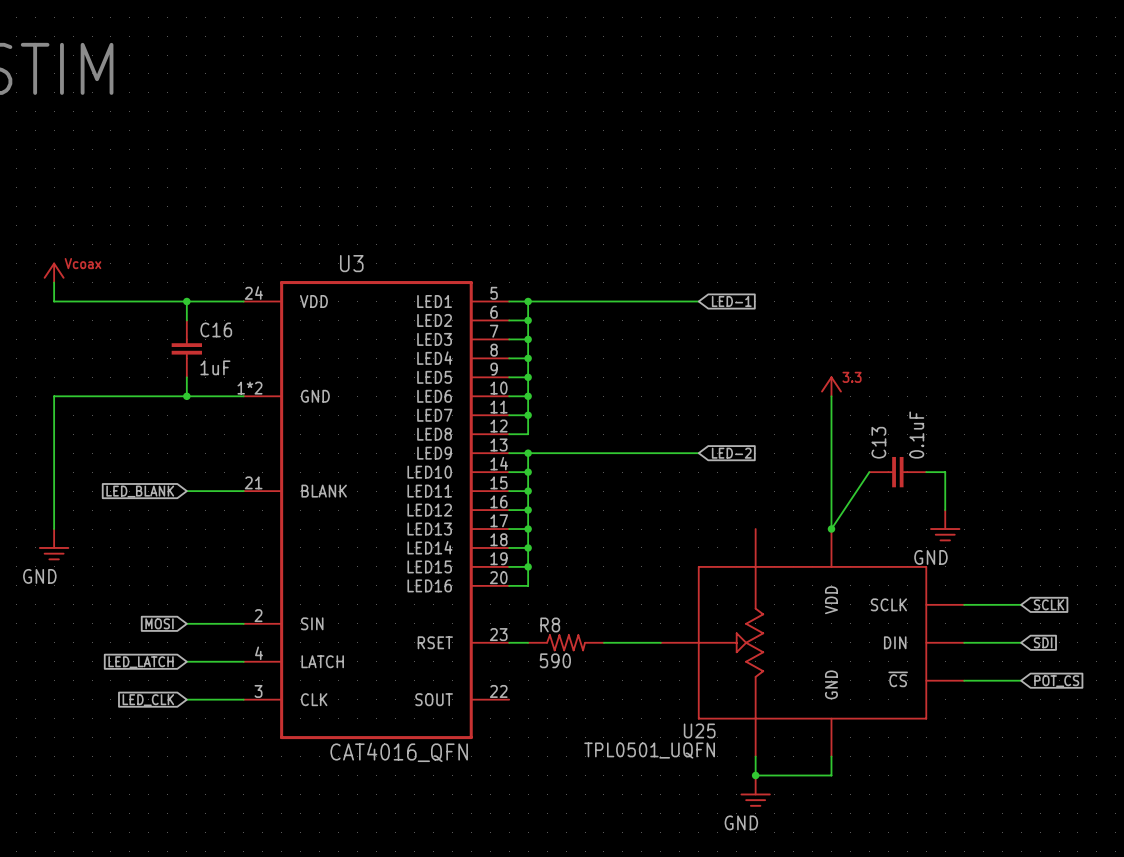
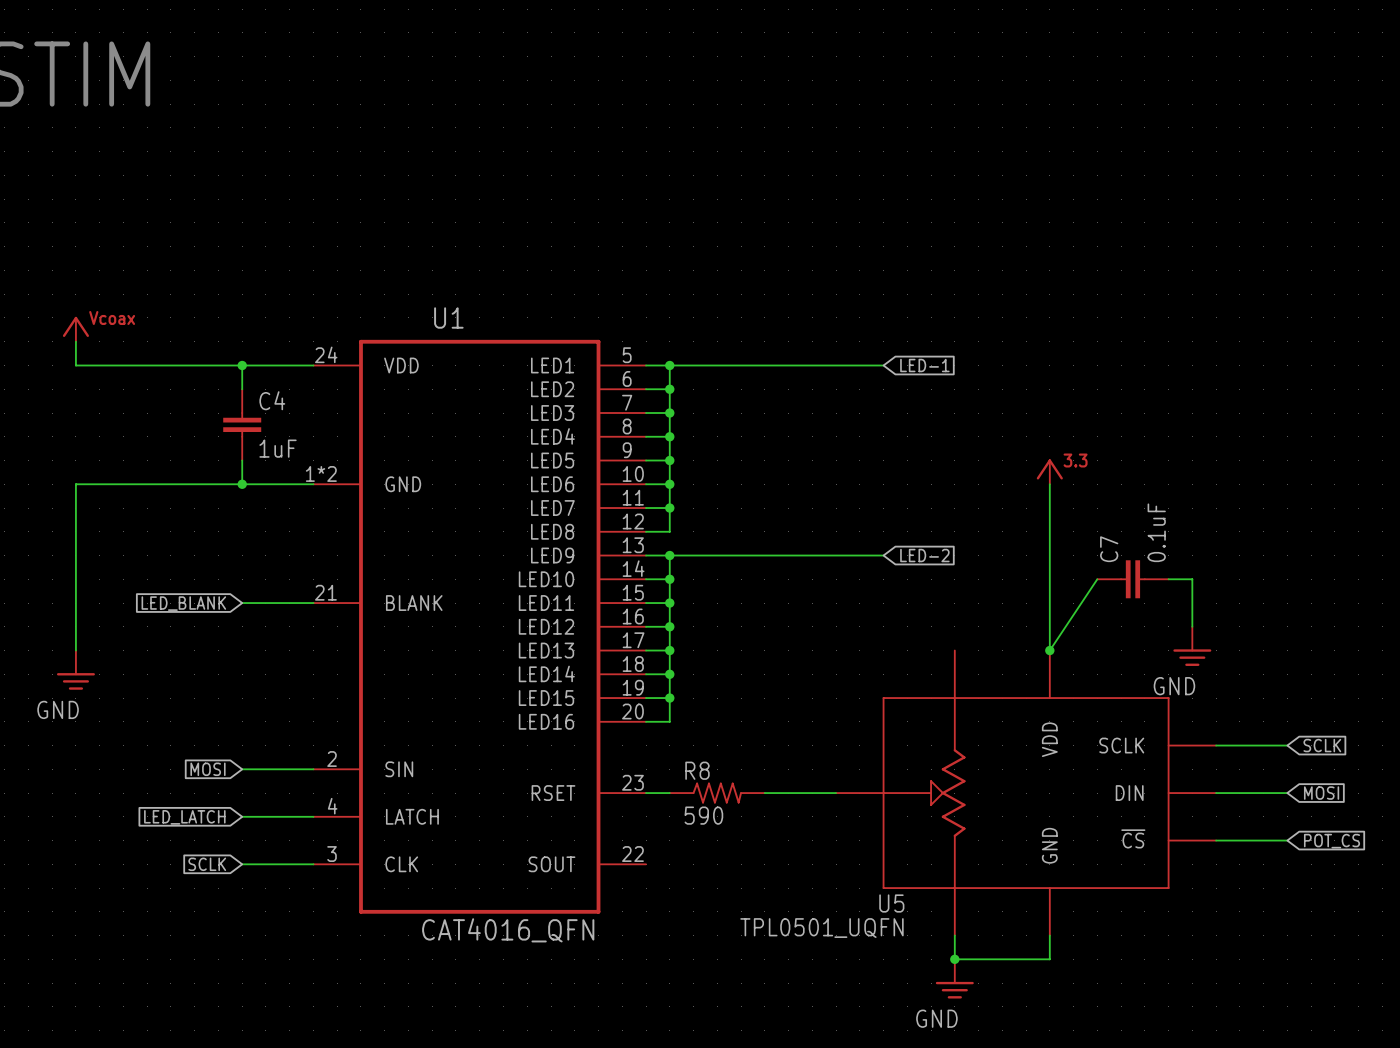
U3 name: U3 (351, 263) -> U1 (448, 317)
C16 name: C16 (216, 329) -> C4 (272, 400)
C13 name: C13 (878, 442) -> C7 (1109, 549)
global label: SDI (1043, 642) -> MOSI (1321, 793)
global label: LED_CLK (148, 700) -> SCLK (207, 864)
U25 name: U25 (699, 730) -> U5 (891, 903)

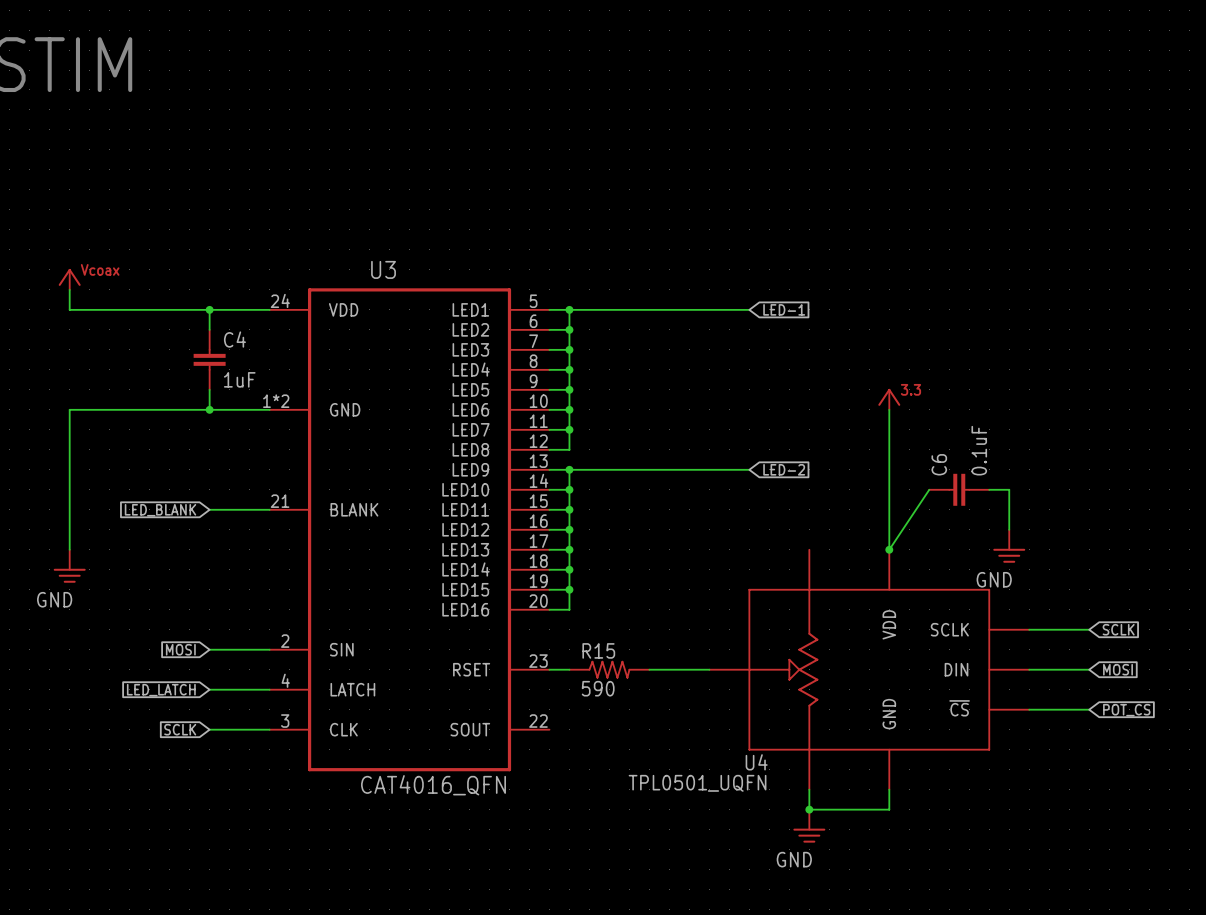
U1 name: U1 (448, 317) -> U3 (383, 269)
C7 name: C7 (1109, 549) -> C6 (939, 464)
R8 name: R8 (697, 770) -> R15 (598, 650)
U5 name: U5 (891, 903) -> U4 (756, 762)

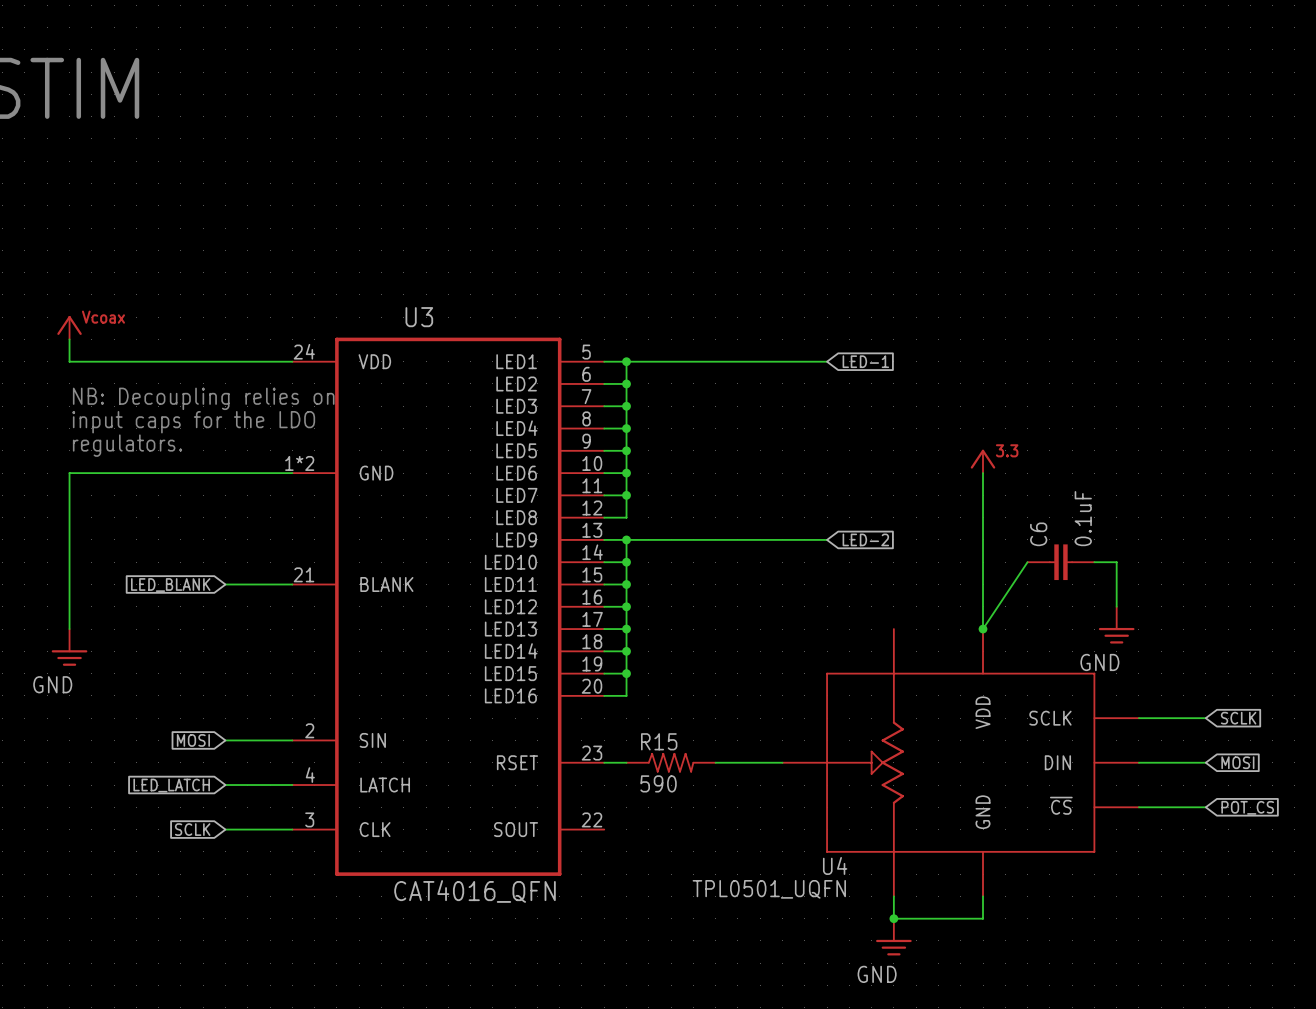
wire: (209, 309) (209, 329) -> none
junction: (209, 309) -> none
text: none -> NB: Decoupling relies on (203, 398)
C4: 1uF (209, 359) -> none
text: none -> input caps for the LDO (193, 422)
text: none -> regulators. (127, 445)
wire: (209, 389) (209, 409) -> none
junction: (209, 409) -> none

